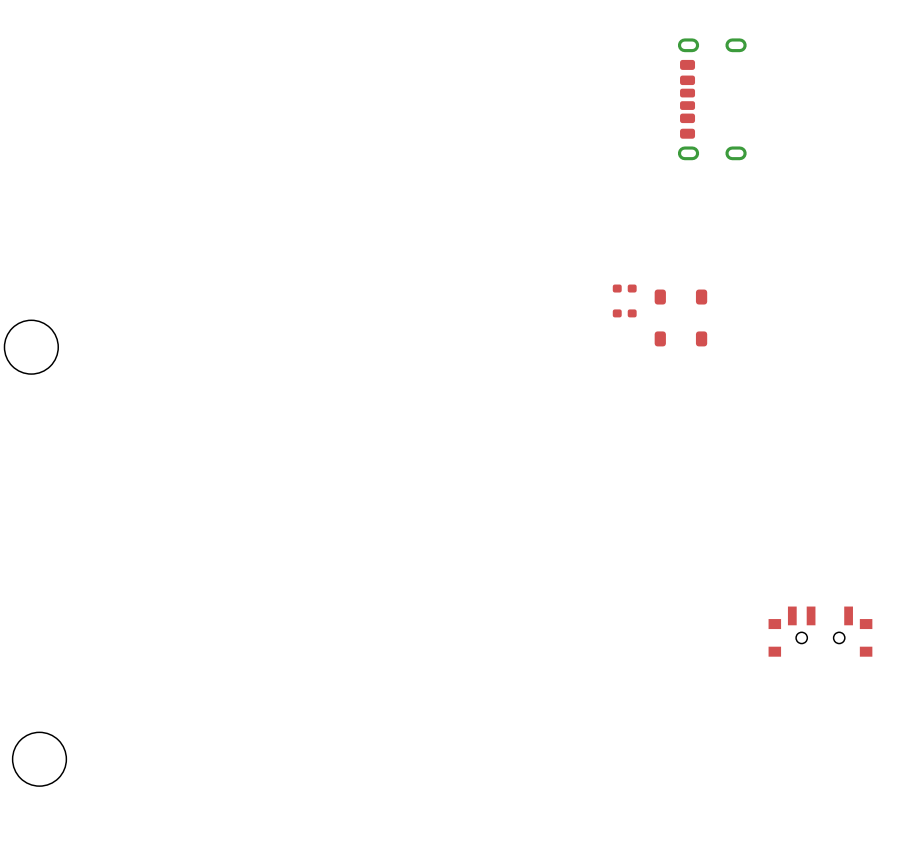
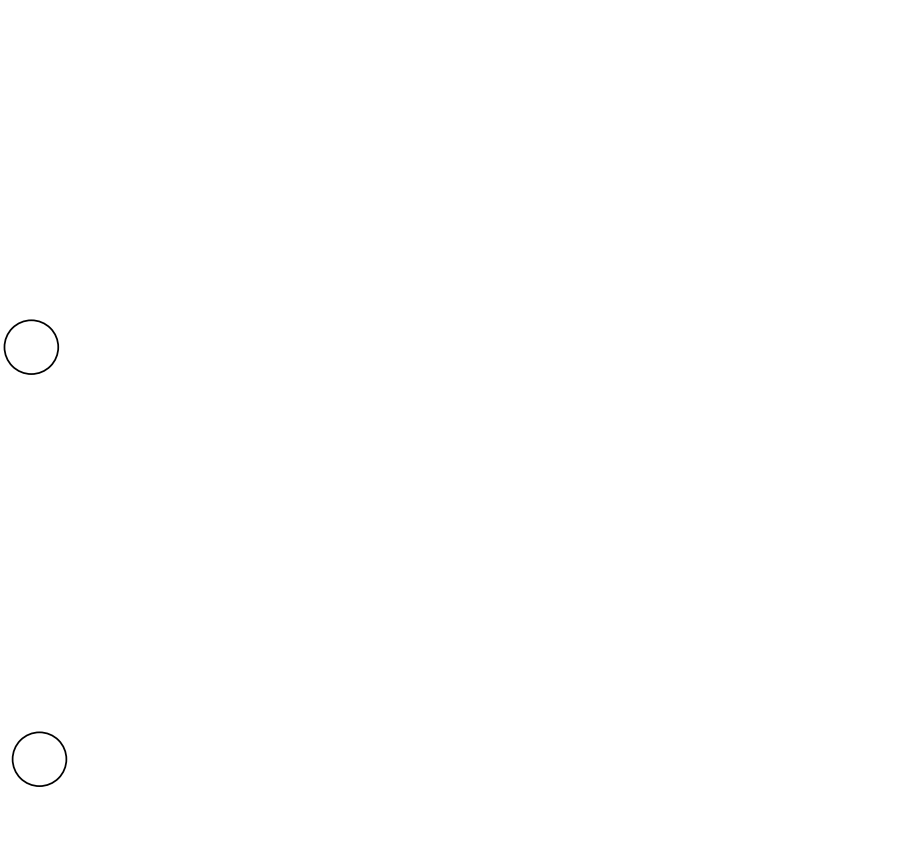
part: (712, 99) -> none
part: (624, 288) -> none
part: (680, 297) -> none
part: (624, 313) -> none
part: (680, 338) -> none
part: (820, 631) -> none

